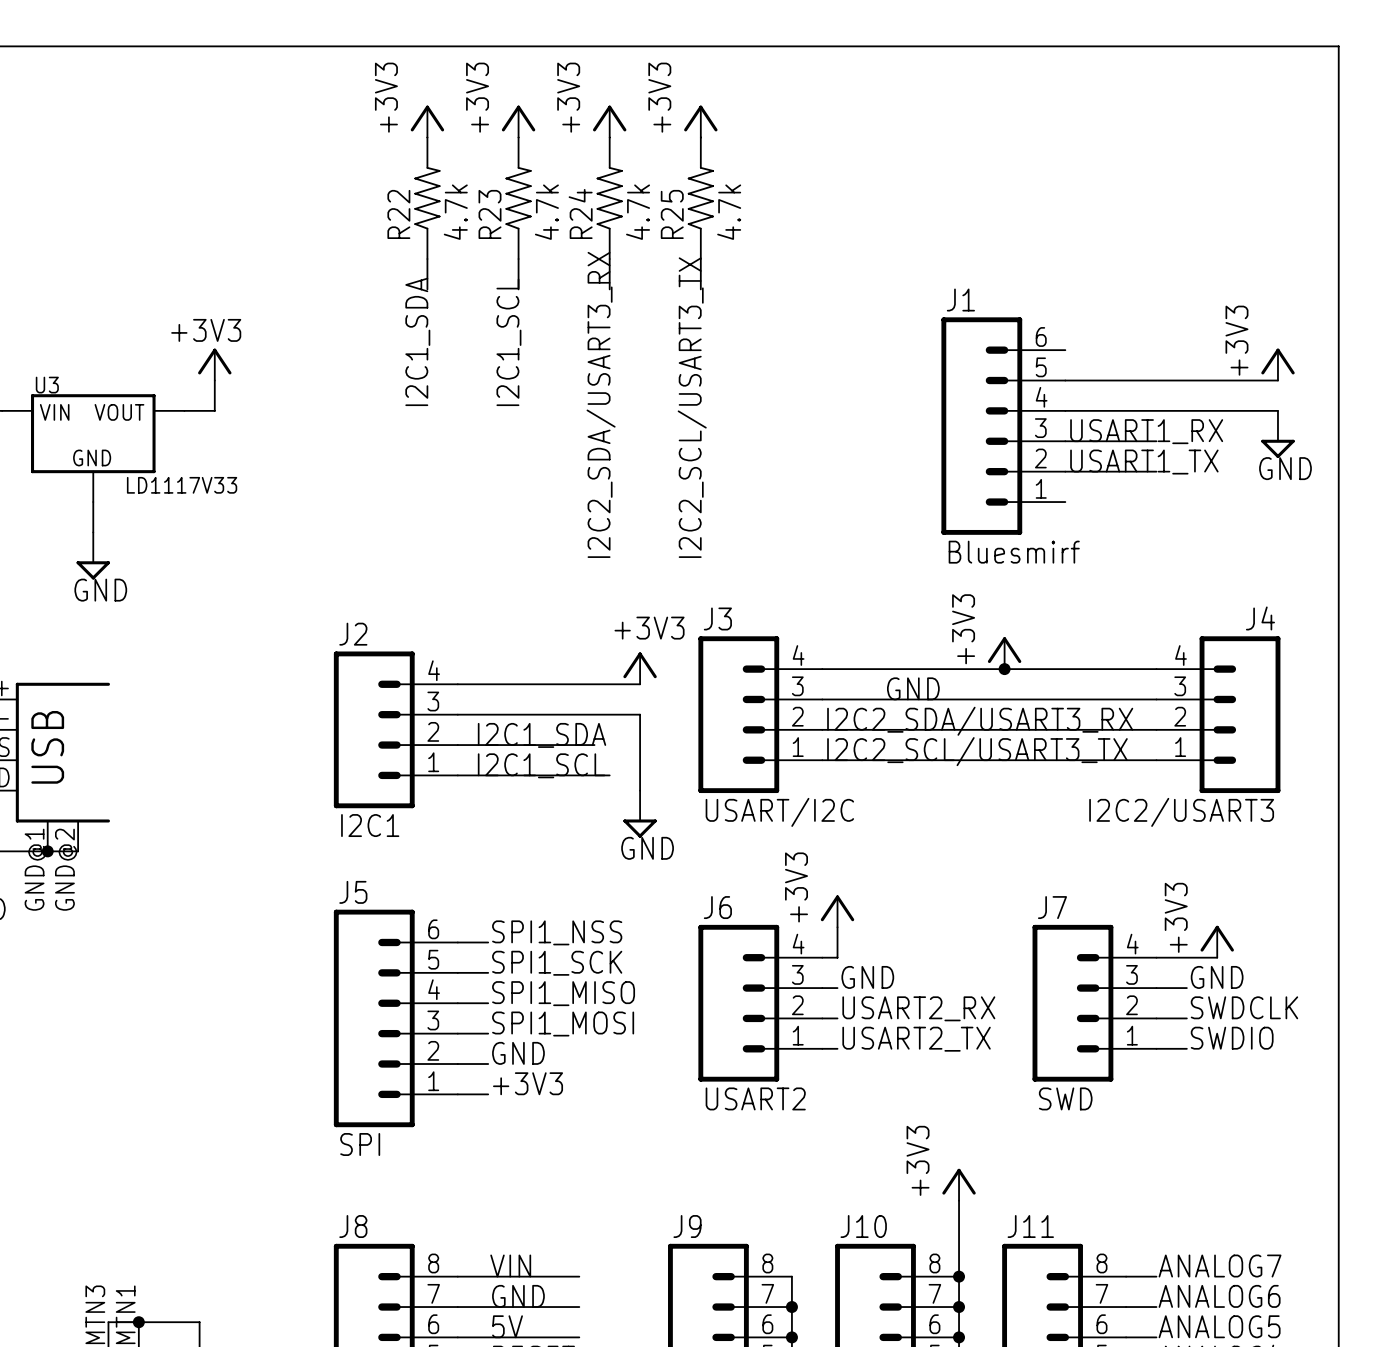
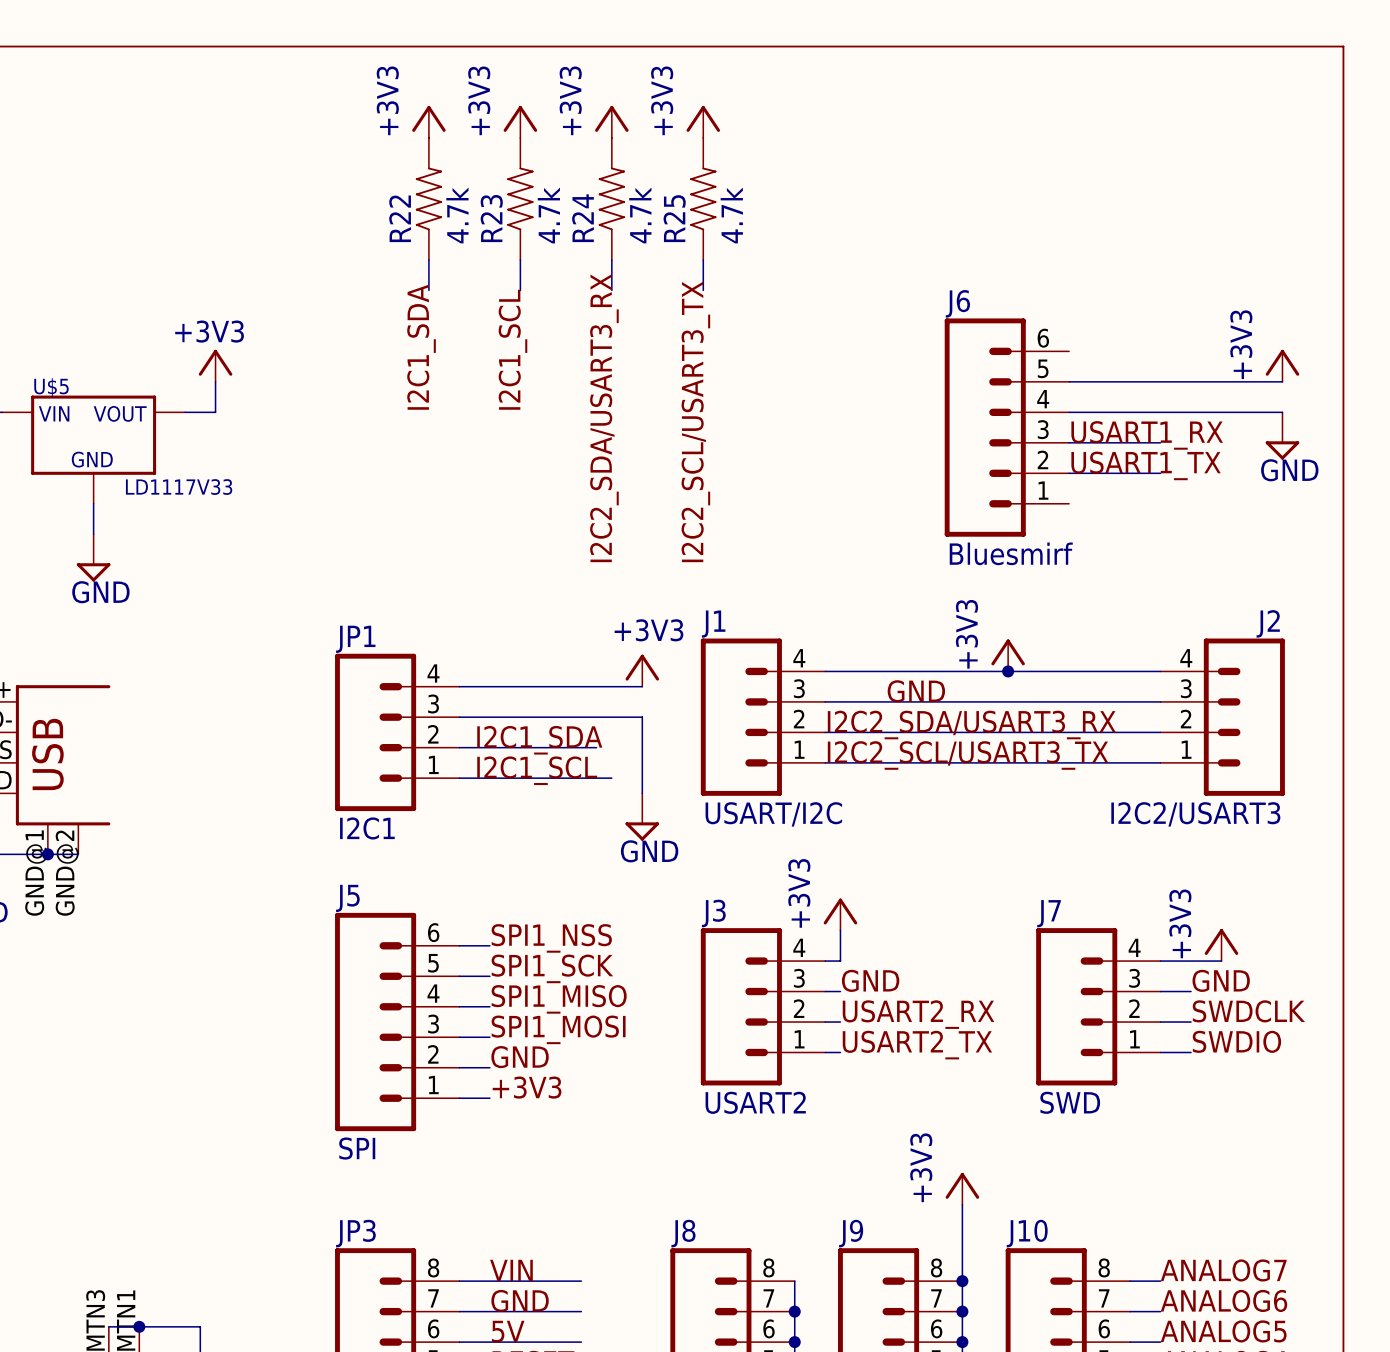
J1 name: J1 (960, 300) -> J6 (957, 303)
U3 name: U3 (47, 385) -> U$5 (51, 387)
J3 name: J3 (717, 618) -> J1 (713, 624)
J4 name: J4 (1260, 618) -> J2 (1268, 623)
J2 name: J2 (353, 634) -> JP1 (355, 639)
J6 name: J6 (717, 907) -> J3 (713, 913)
J8 name: J8 (353, 1226) -> JP3 (355, 1233)
J9 name: J9 (687, 1226) -> J8 (683, 1233)
J10 name: J10 (863, 1226) -> J9 (851, 1233)
J11 name: J11 (1030, 1226) -> J10 (1027, 1233)

